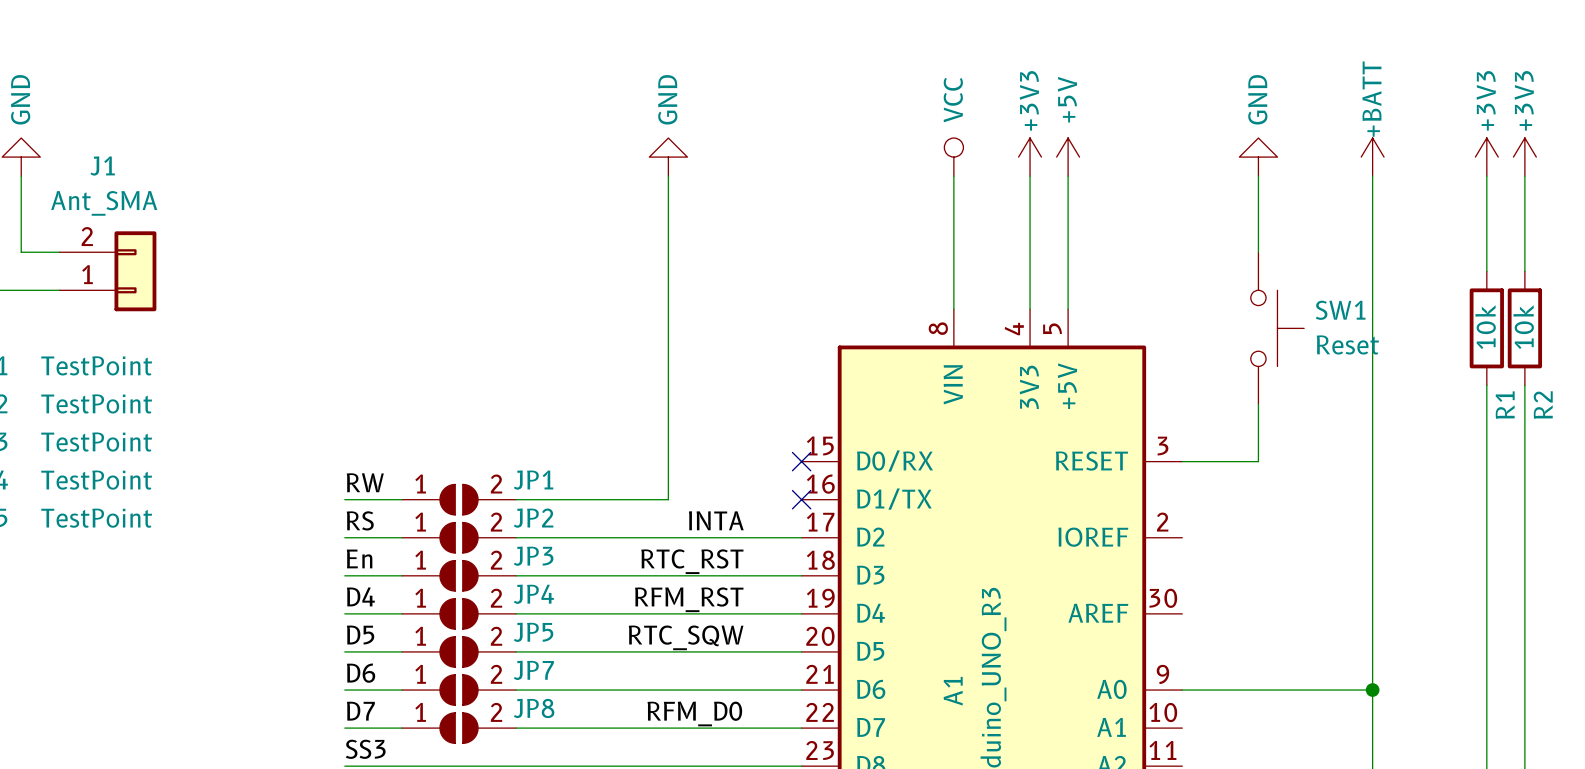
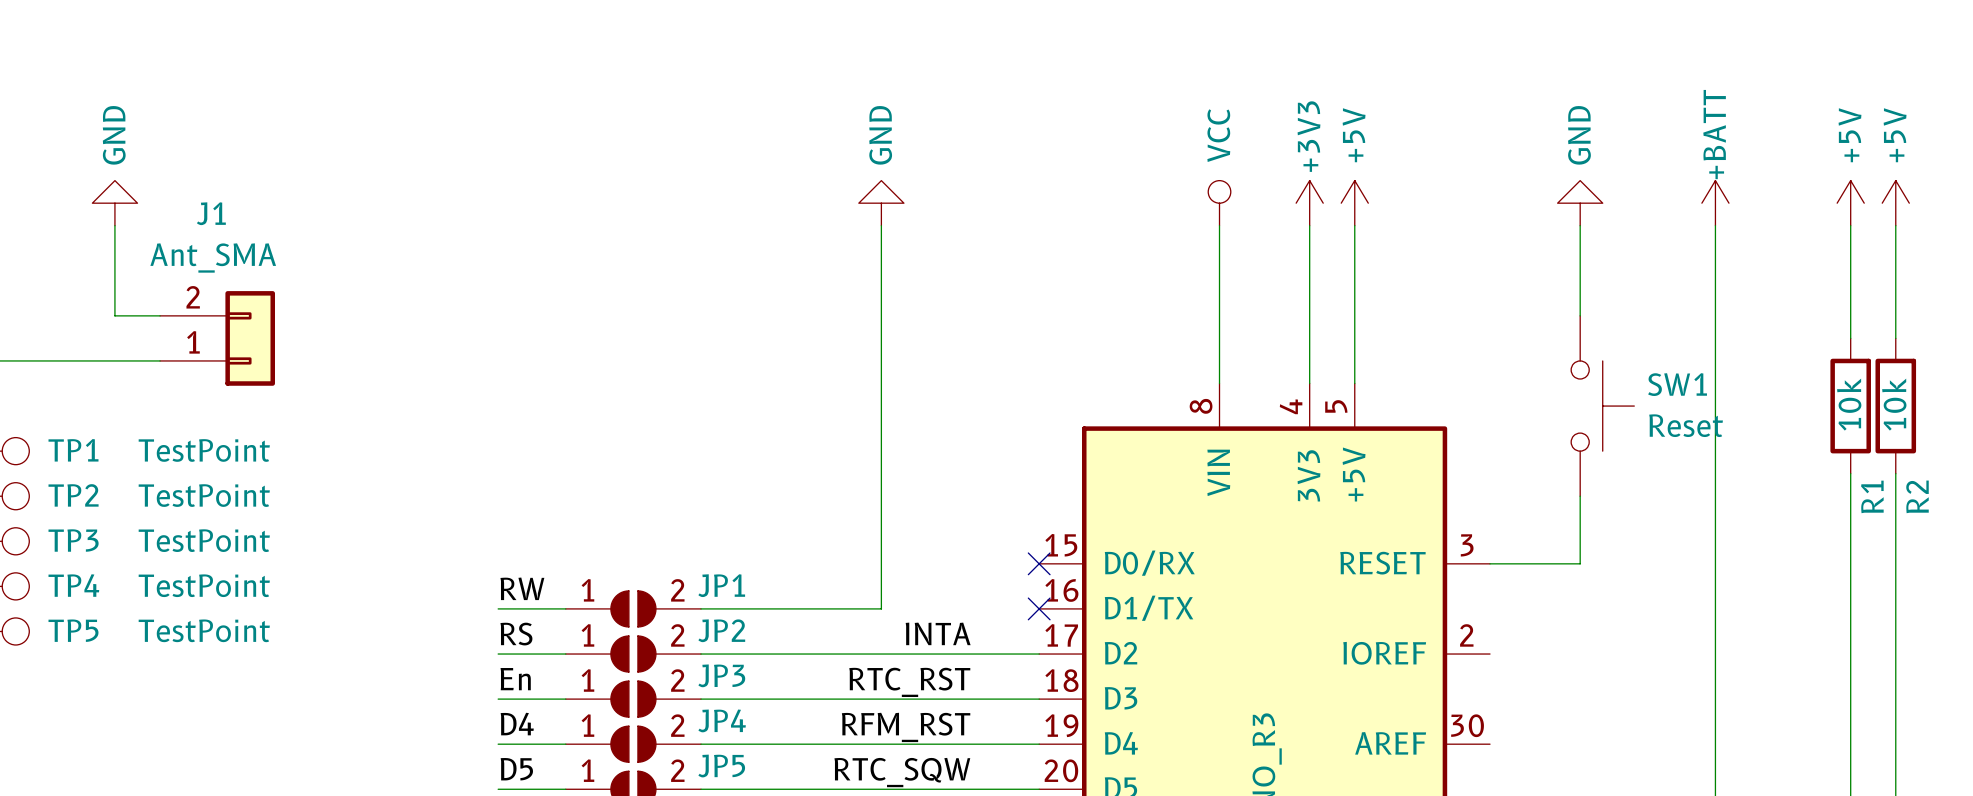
power symbol: +3V3 (1486, 157) -> +5V (1850, 203)
power symbol: +3V3 (1524, 157) -> +5V (1895, 203)

